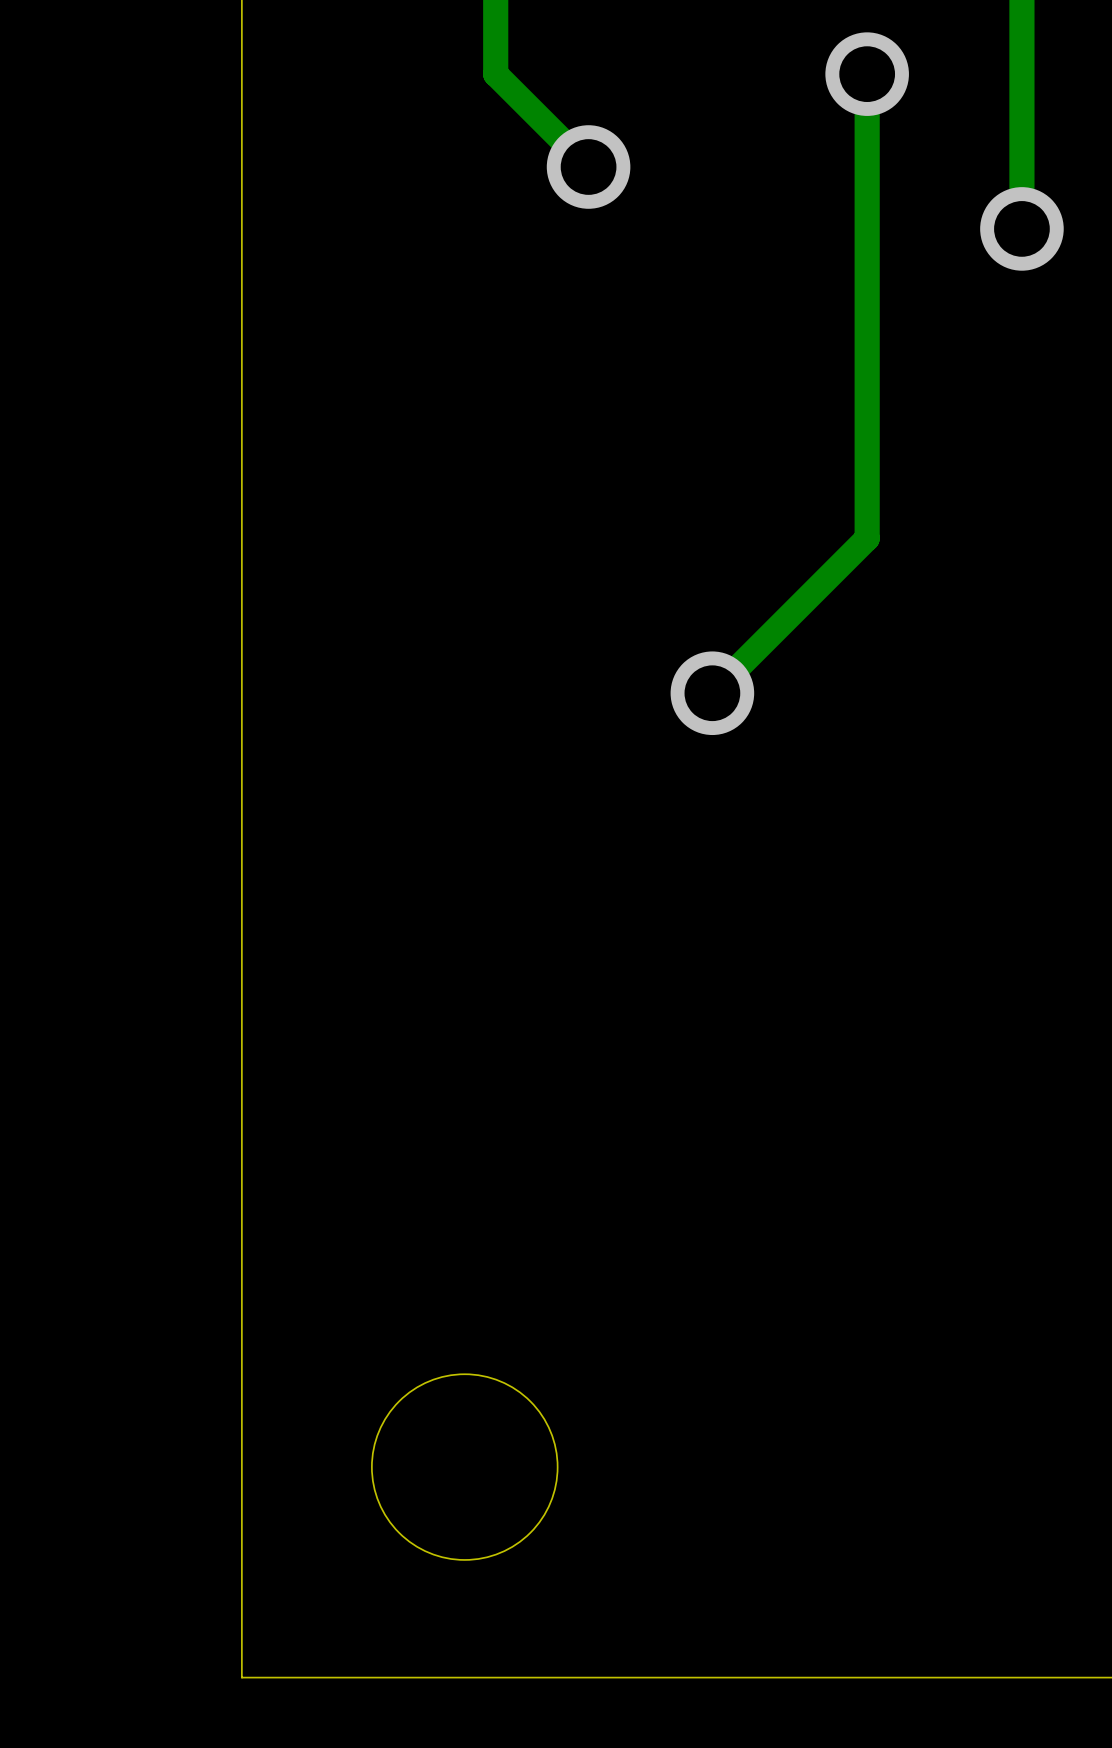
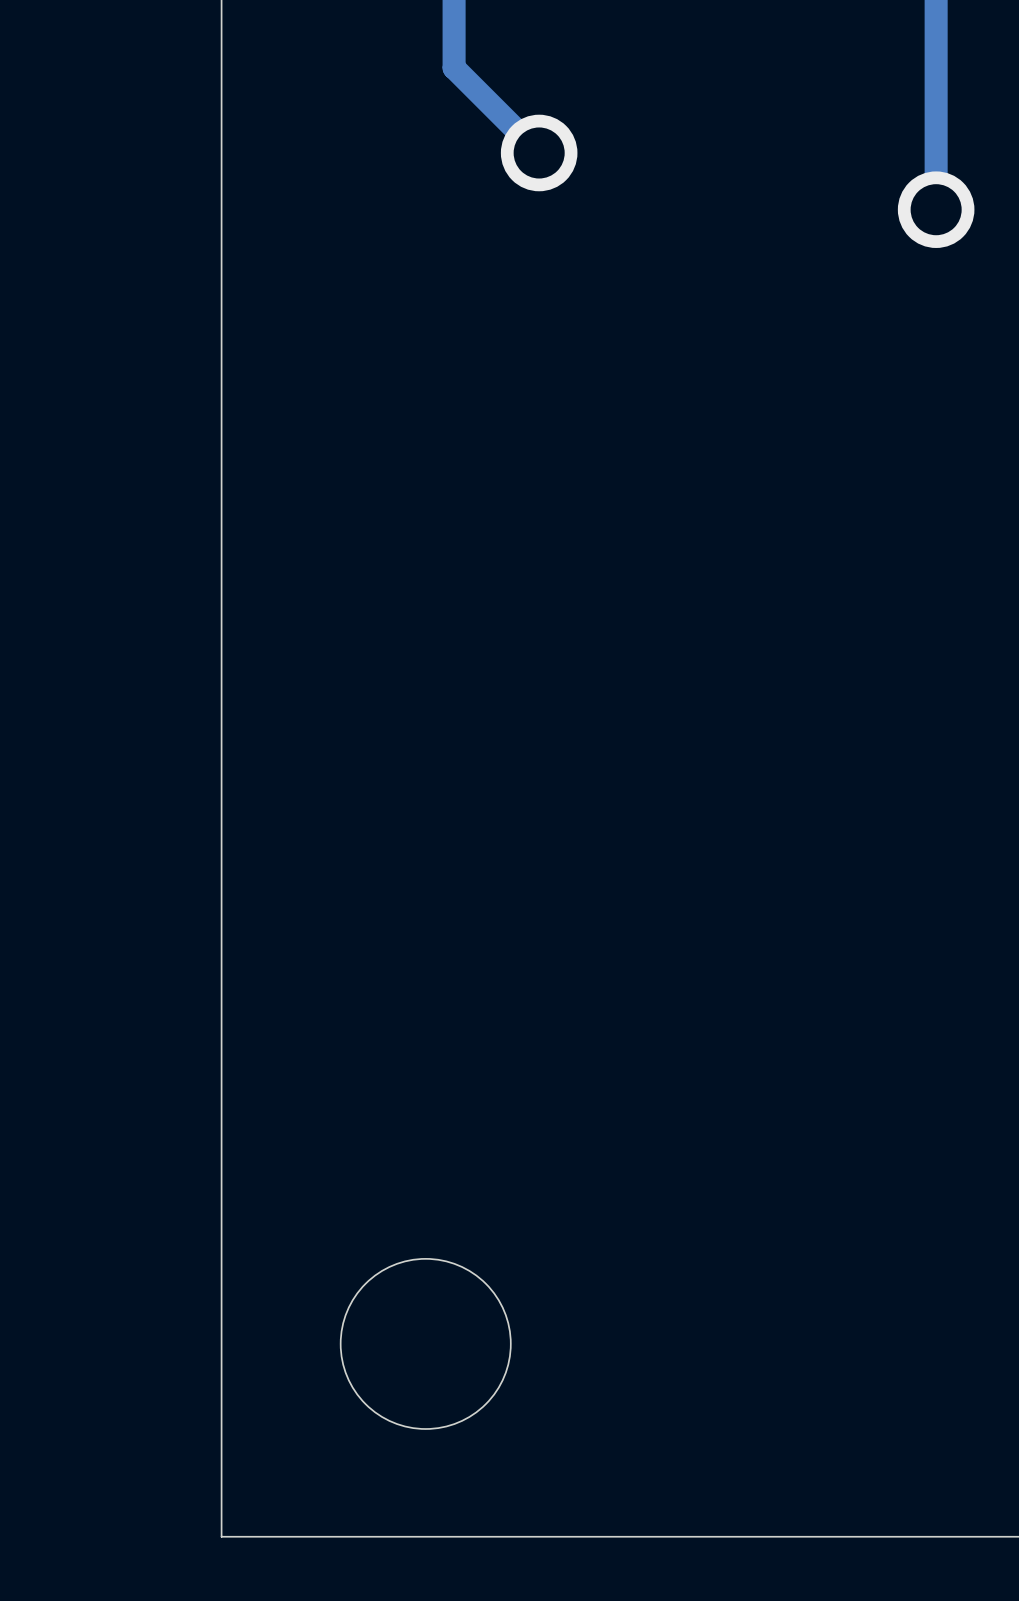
track: (867, 74) (867, 538) (712, 693) -> none
via: (867, 74) -> none
via: (712, 693) -> none

